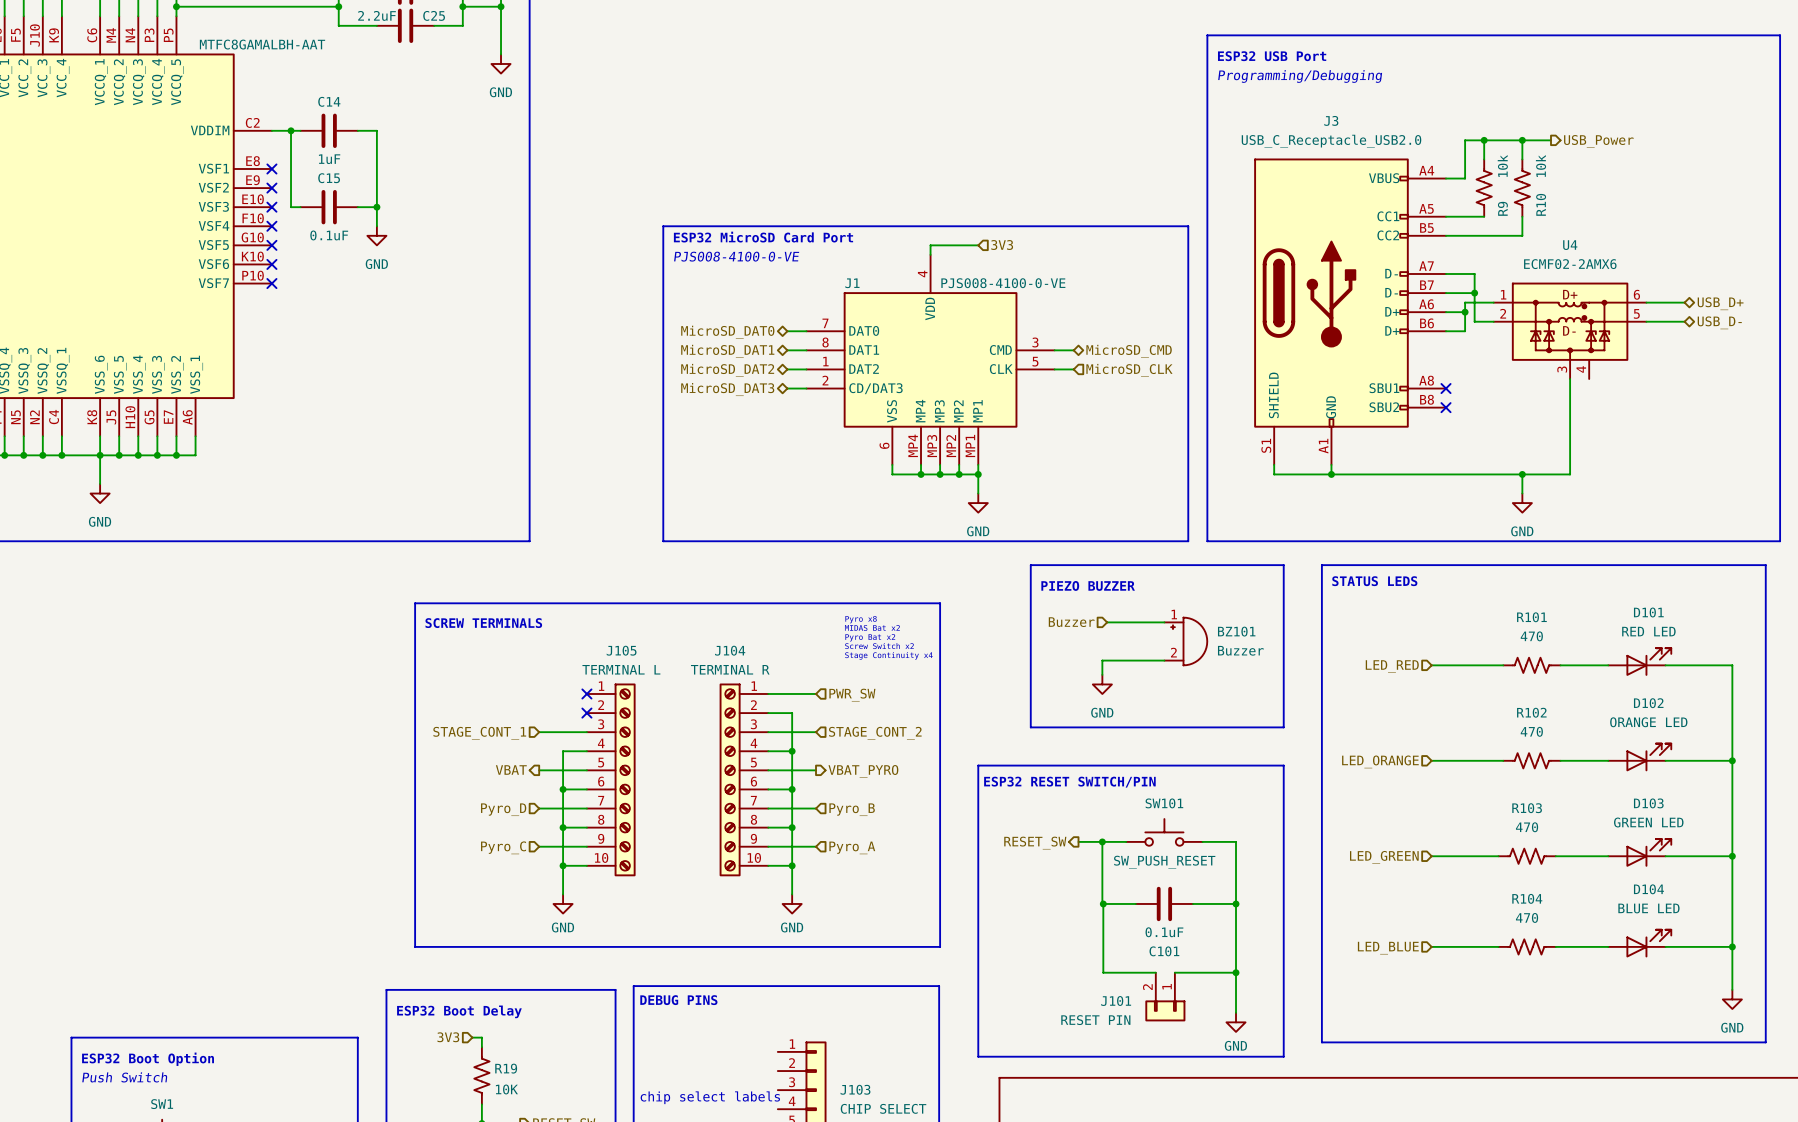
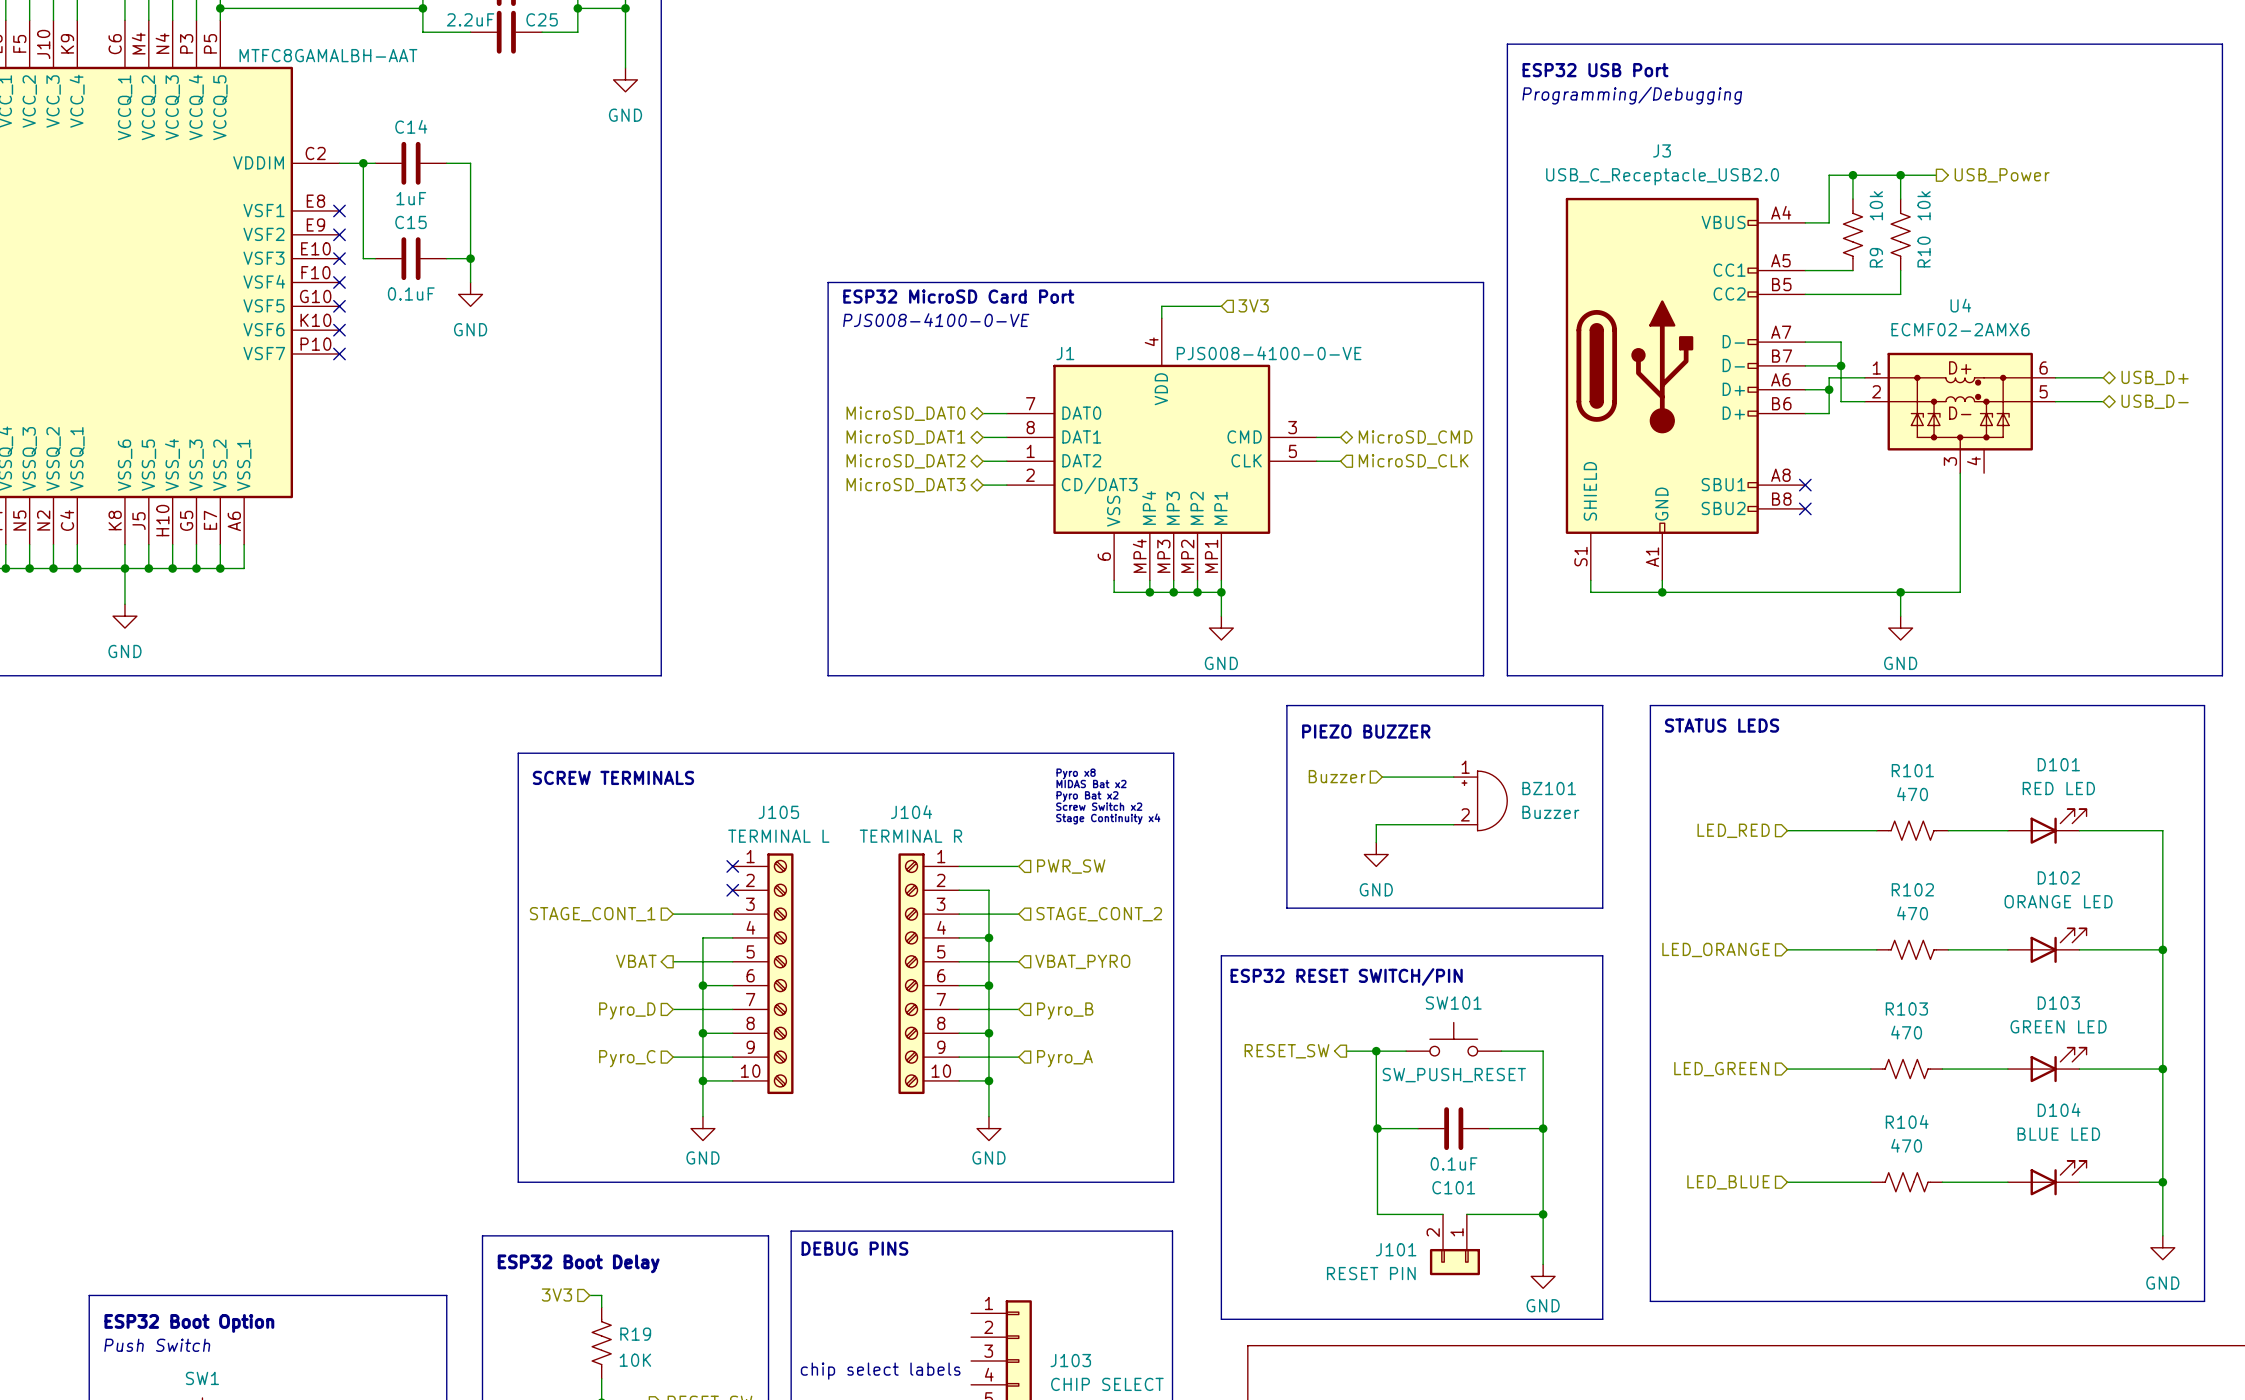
hierarchical label shape: output (863, 771) -> input (1082, 961)

